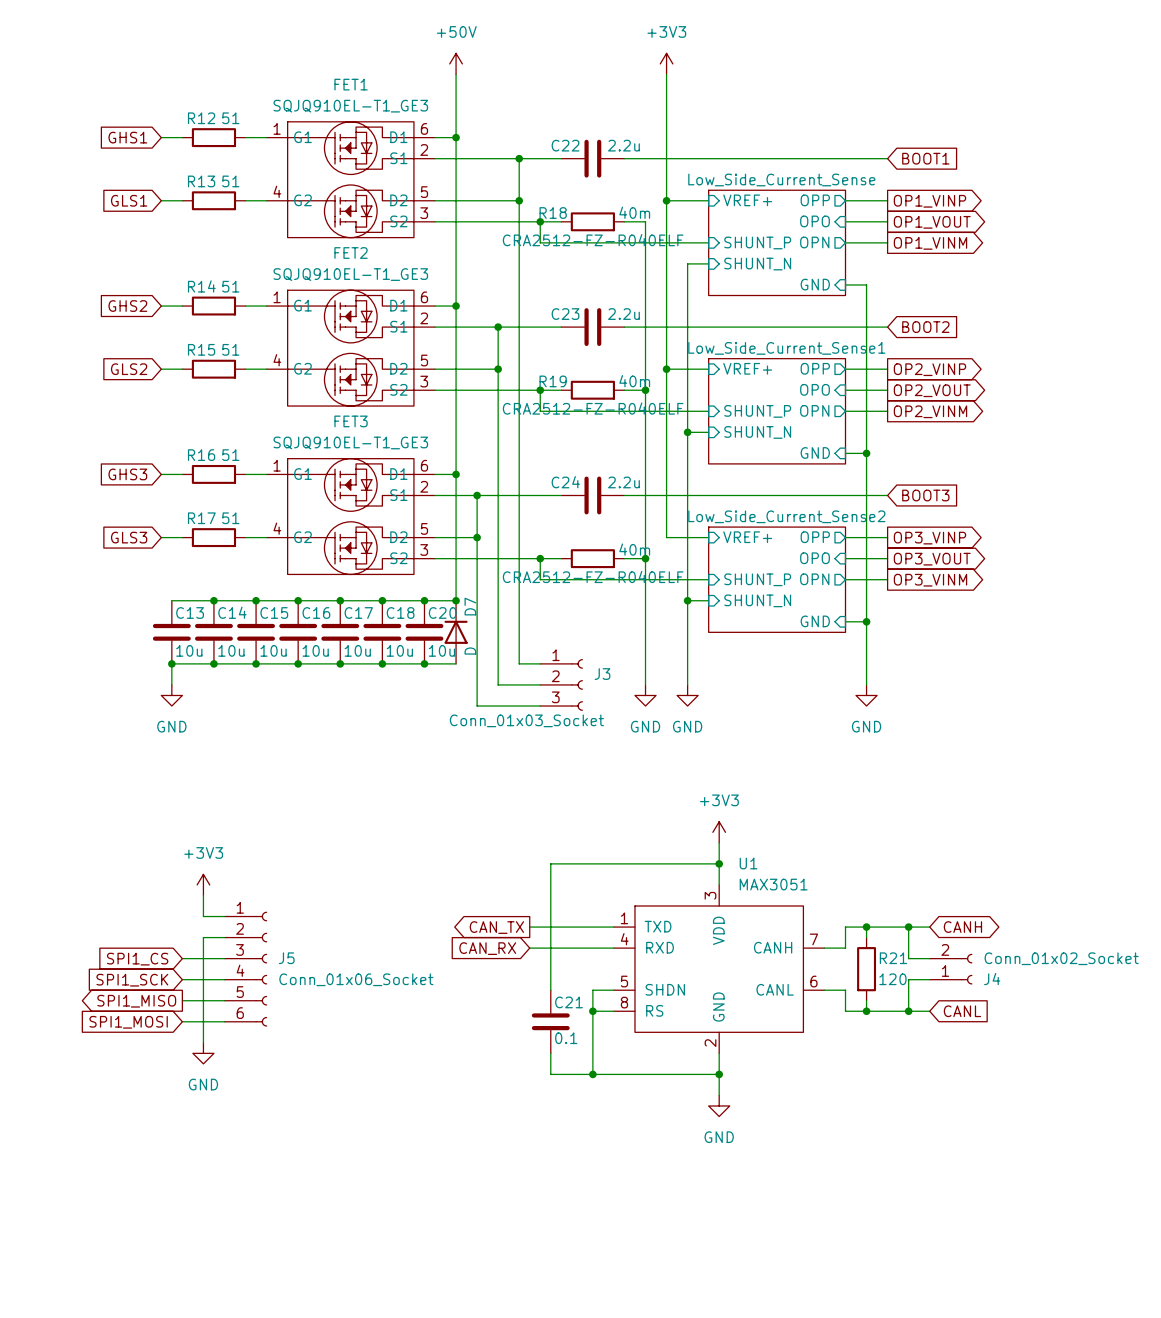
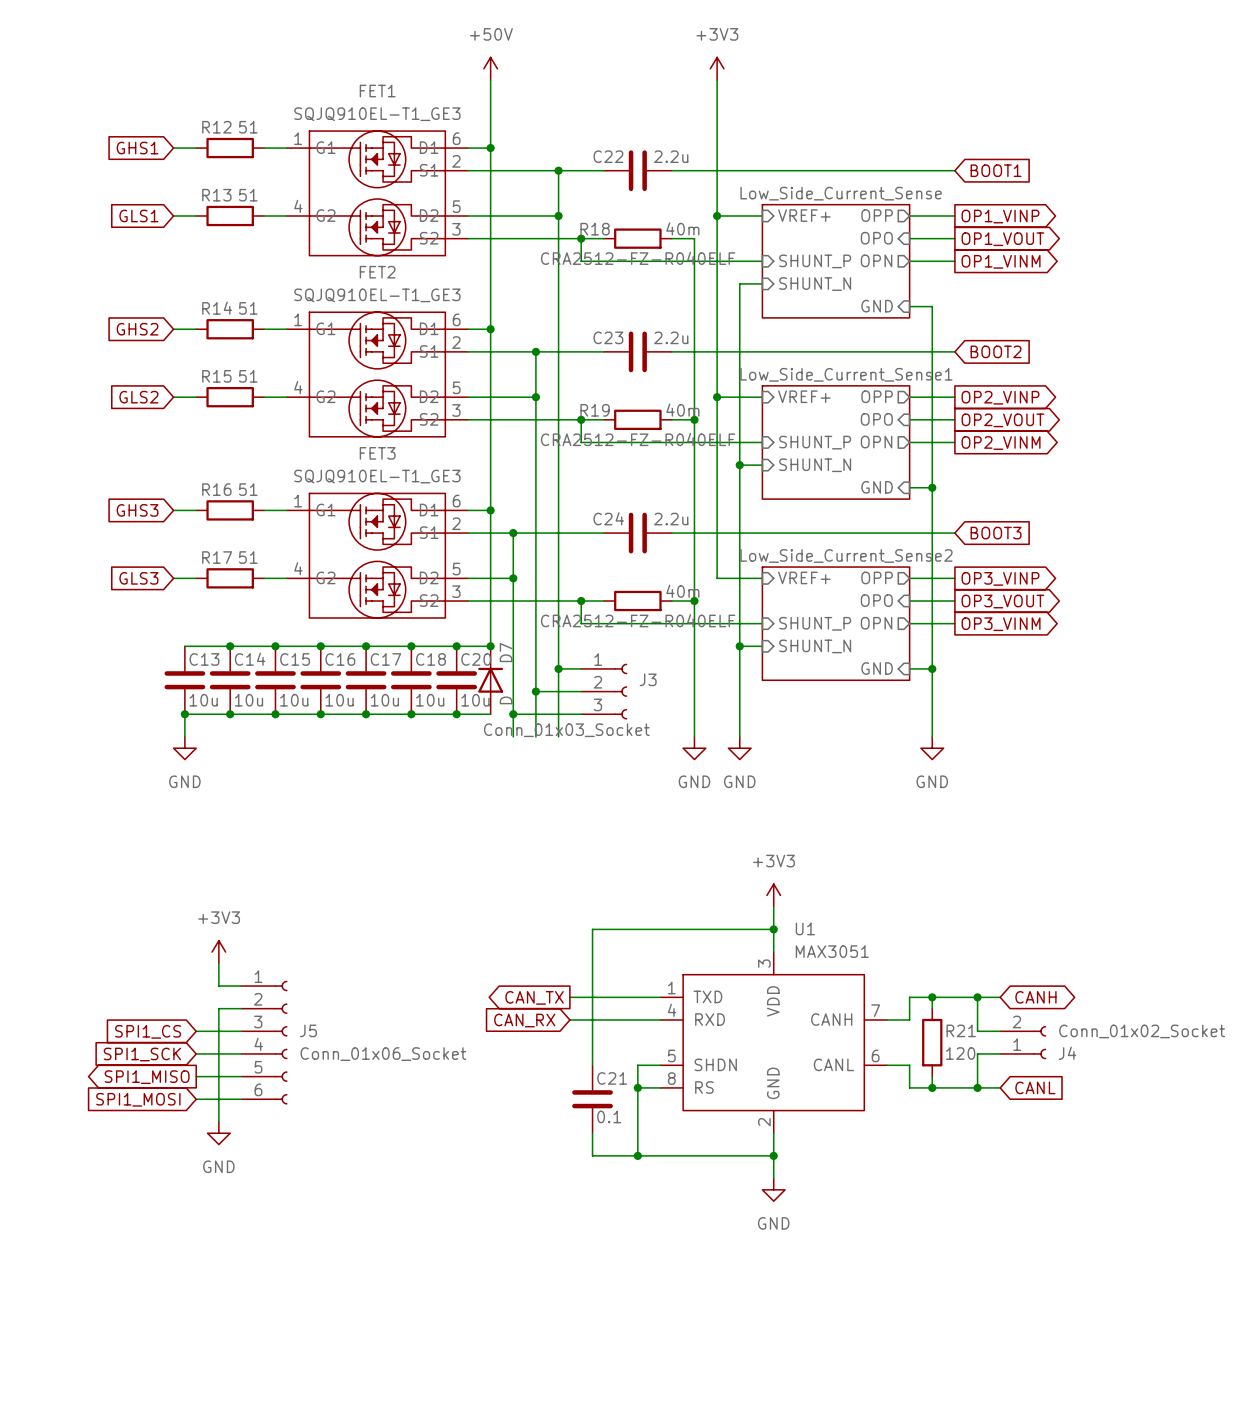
wire: none -> (558, 668) (581, 668)
junction: none -> (558, 668)
junction: none -> (535, 691)
wire: none -> (513, 714) (558, 714) (558, 736)
junction: none -> (513, 714)
wire: (477, 684) (477, 706) (540, 706) -> none
wire: (498, 684) (540, 684) -> (535, 691) (581, 691)
J3 position: (561, 684) -> (604, 691)

